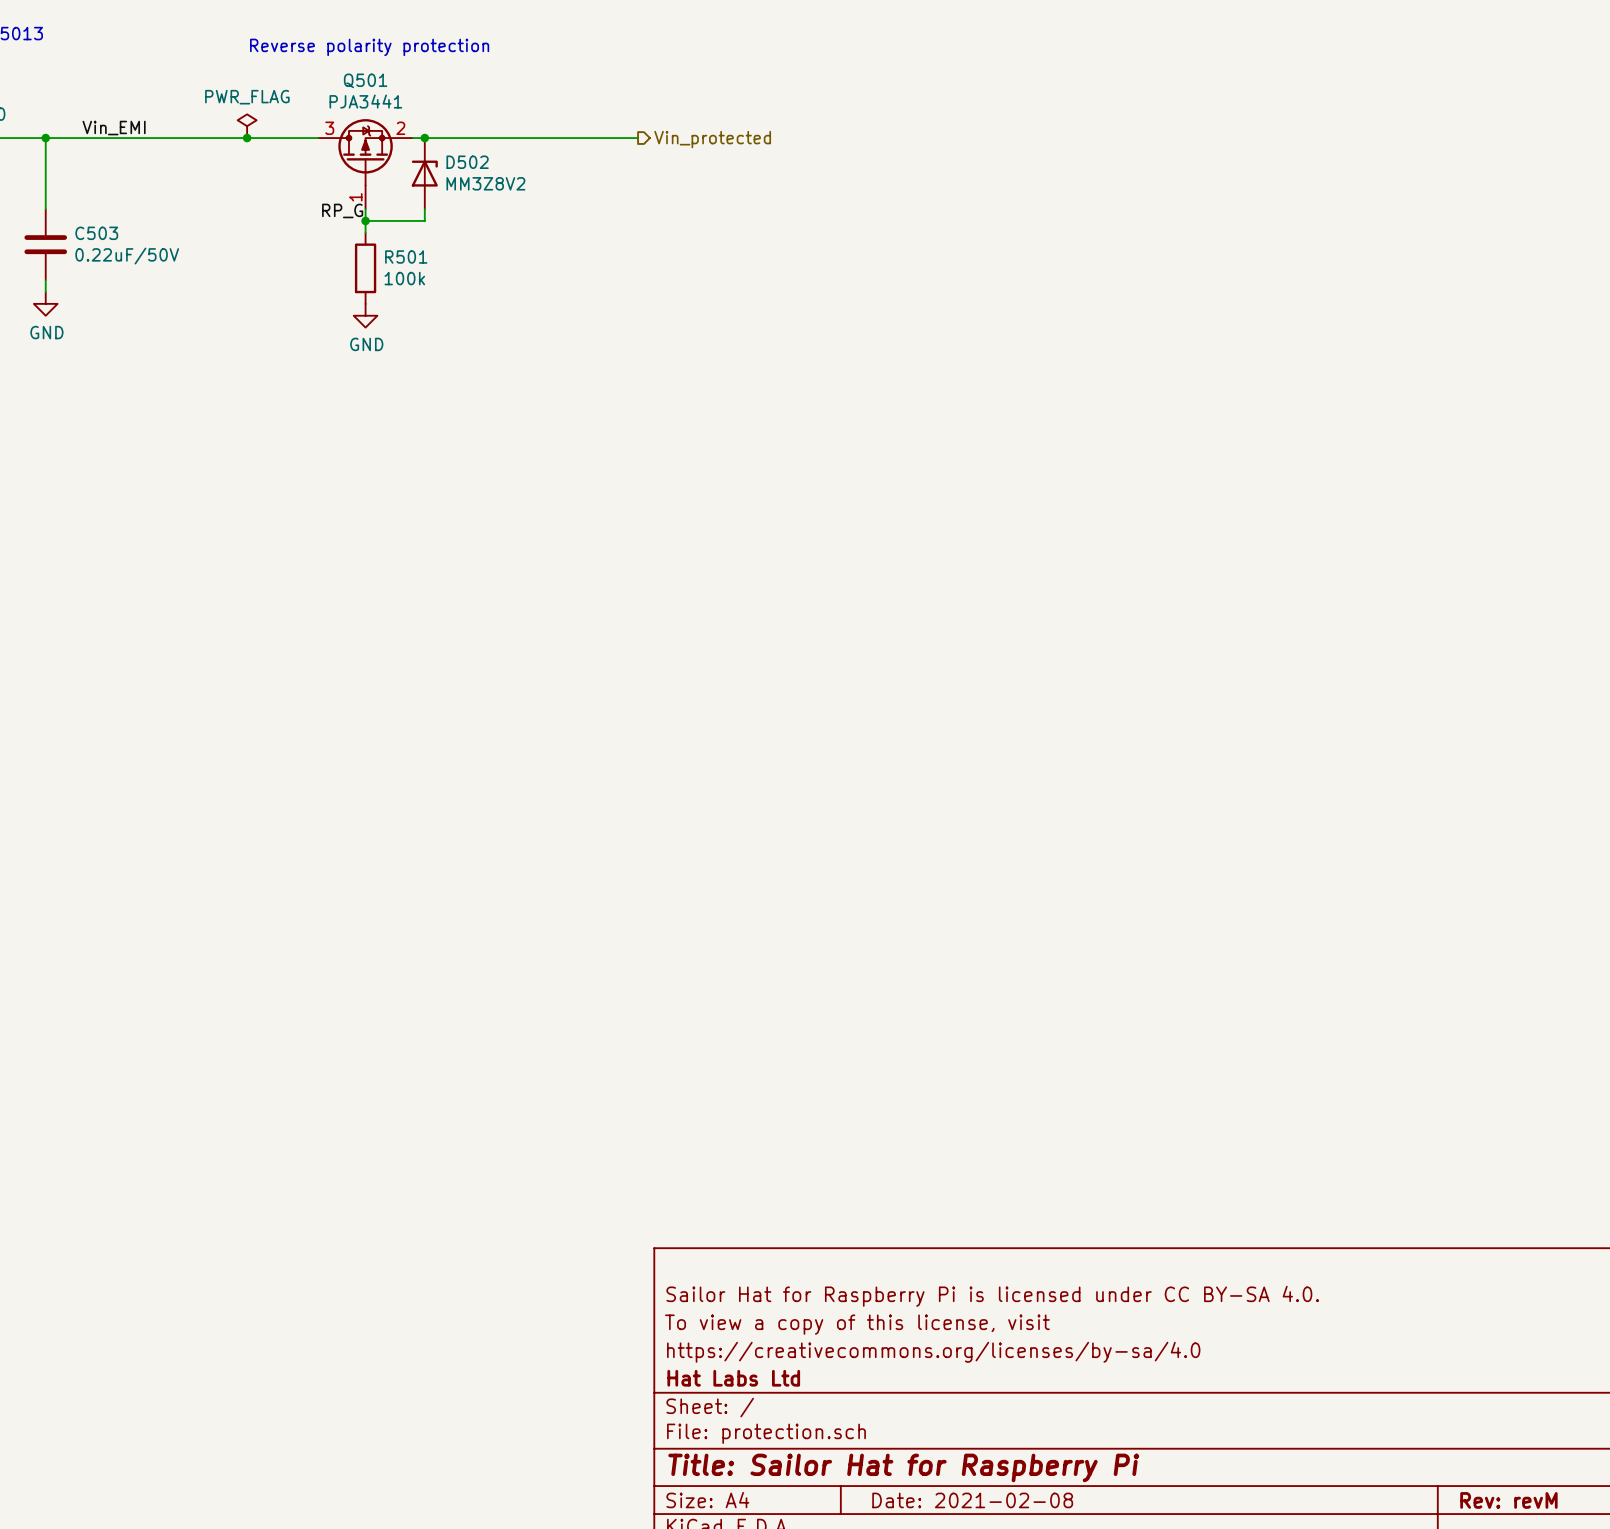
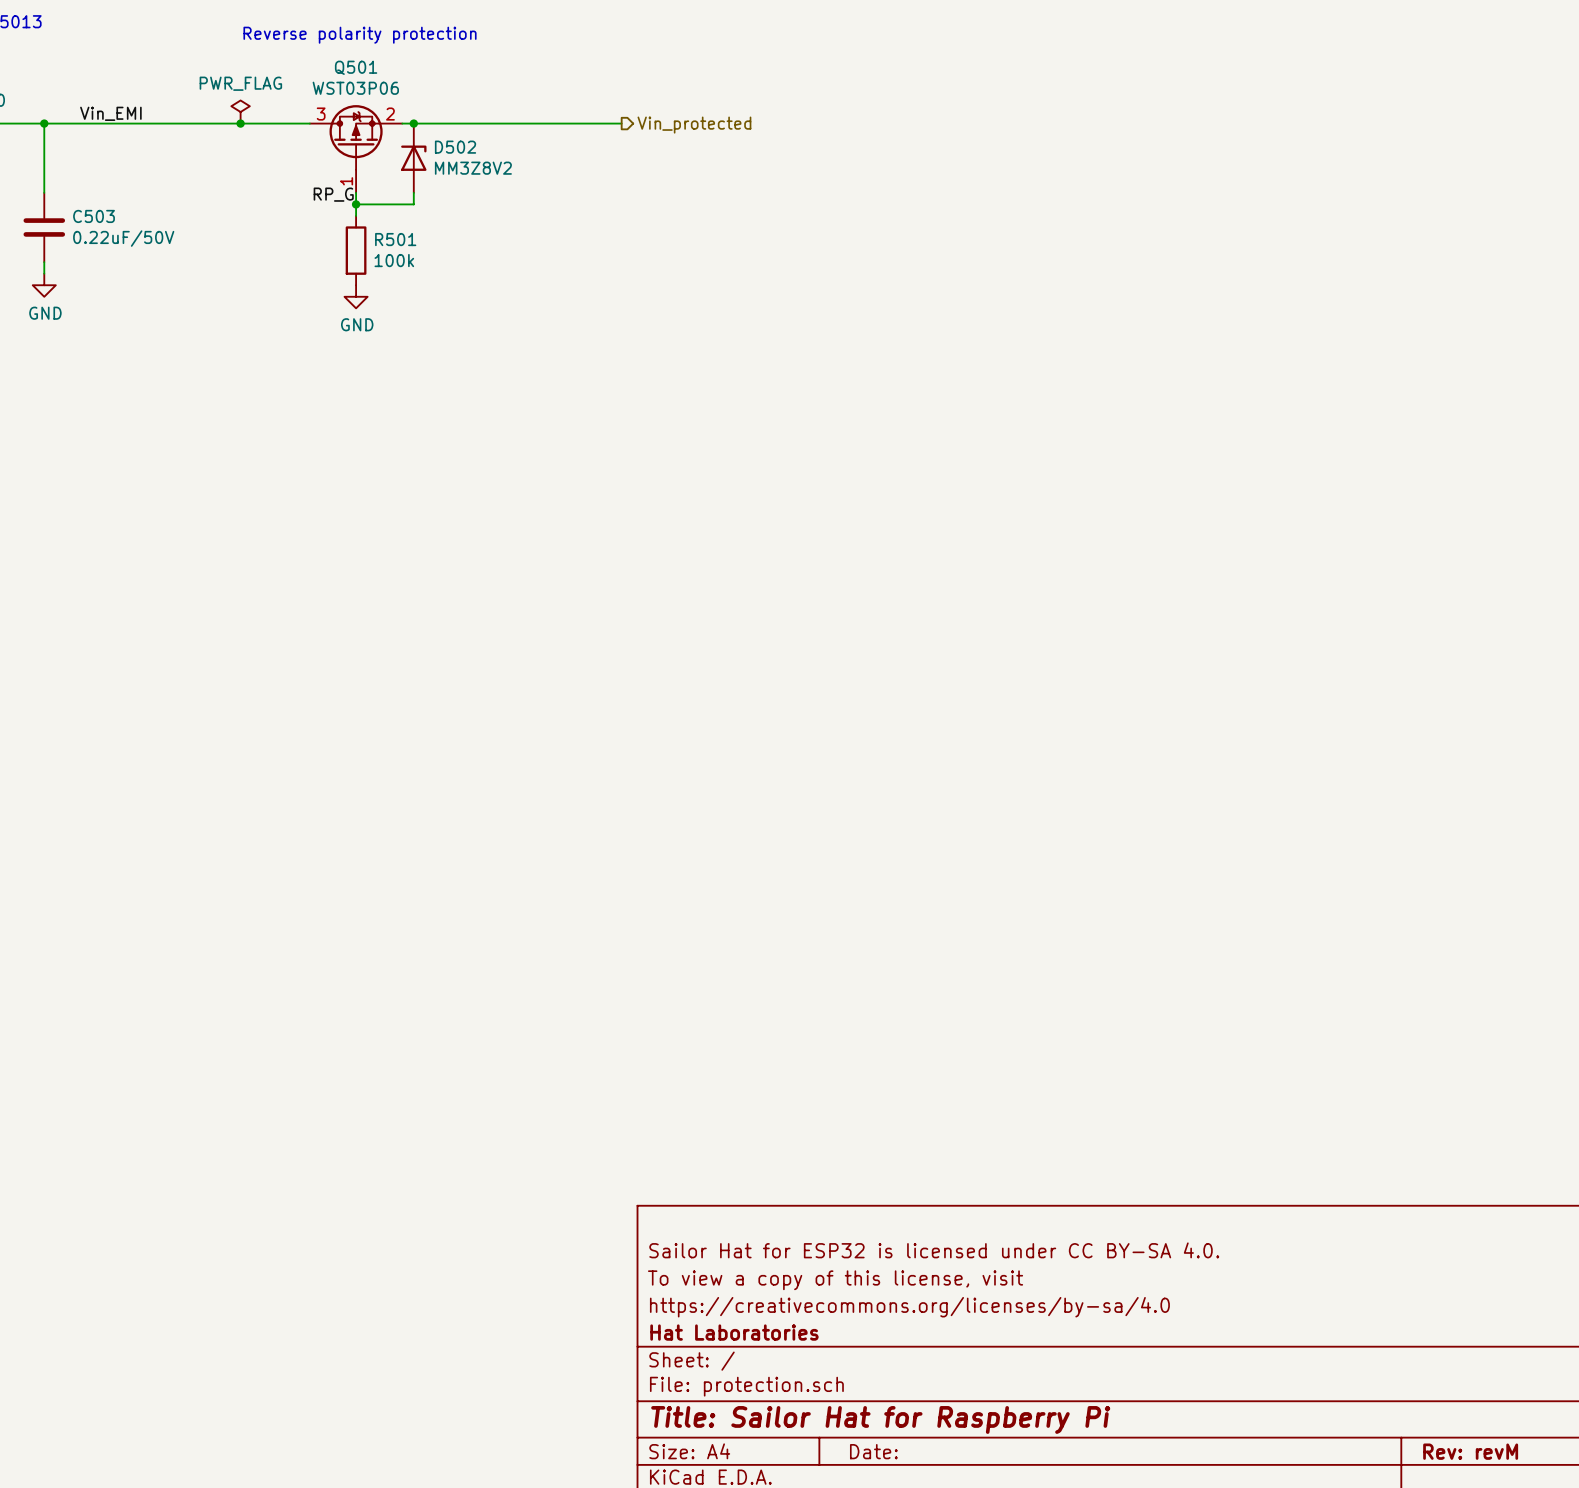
Q501 value: PJA3441 (365, 101) -> WST03P06 (355, 88)
title block: Sailor Hat for Raspberry Pi is licensed under CC BY-SA 4.0. (992, 1296) -> Sailor Hat for ESP32 is licensed under CC BY-SA 4.0. (934, 1250)
title block: Hat Labs Ltd (733, 1378) -> Hat Laboratories (734, 1332)
title block: Date: 2021-02-08 (972, 1500) -> Date: (873, 1451)

